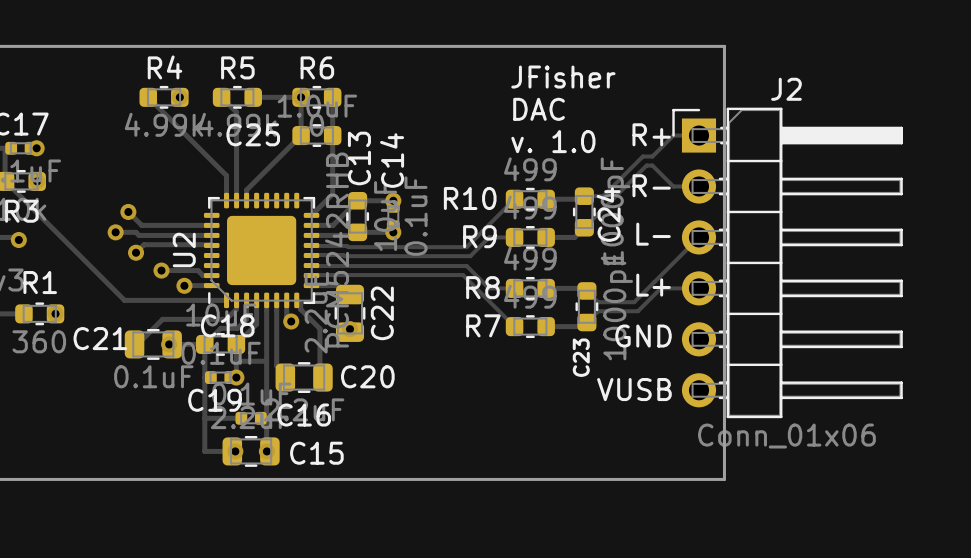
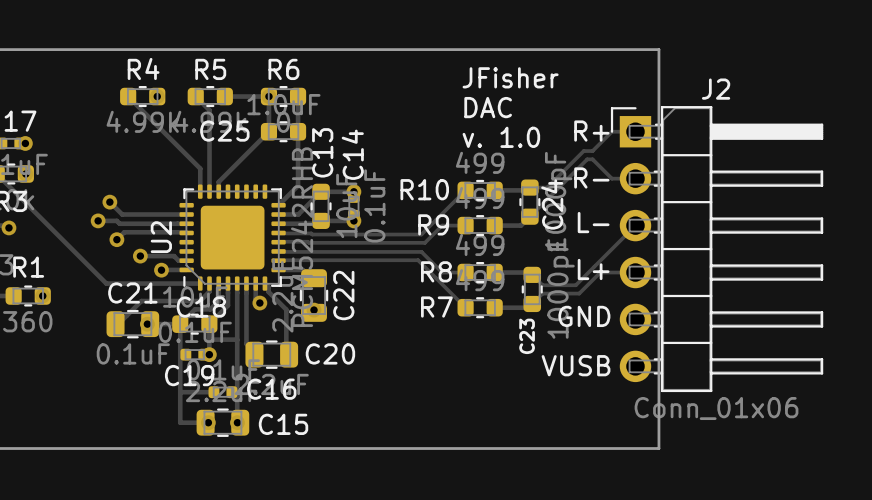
C21 name position: C21 (100, 338) -> C21 (132, 292)

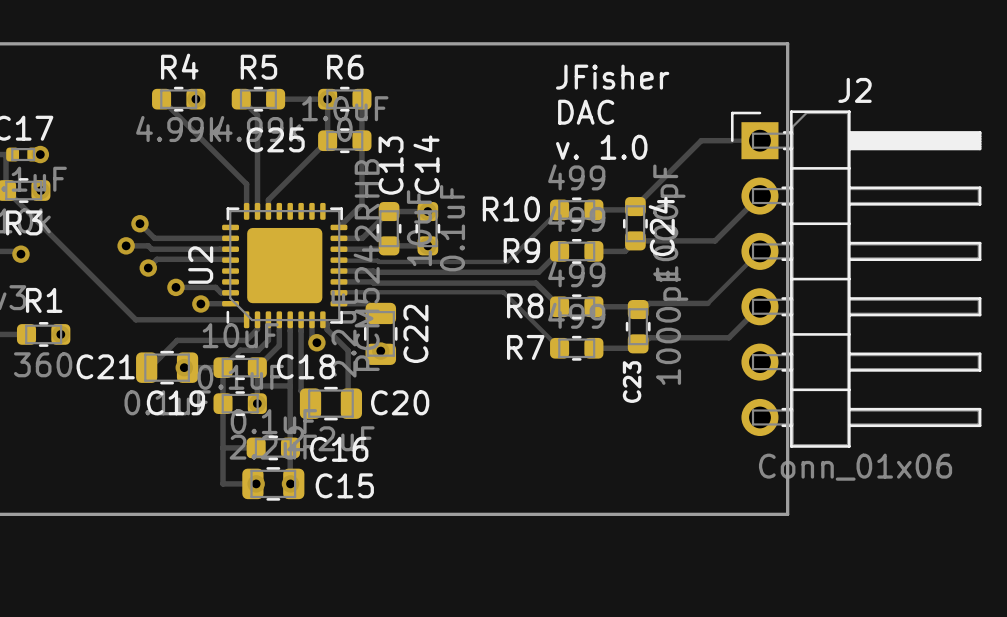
text: R+ (591, 131) -> none
track: (611, 131) (592, 151) (583, 151) (547, 187) (529, 187) -> (732, 140) (701, 140) (635, 206)
text: R- (591, 177) -> none
track: (635, 178) (611, 178) (592, 159) (587, 159) (529, 216) -> (759, 196) (715, 240) (635, 240)
C14 footprint: [347, 191, 360, 221] -> [415, 202, 441, 256]
text: L- (593, 222) -> none
track: (465, 225) (442, 225) (424, 242) (278, 242) -> (559, 251) (538, 272) (338, 271)
track: (278, 251) (421, 251) (442, 272) (465, 272) -> (338, 281) (535, 283) (559, 306)
track: (591, 269) (575, 285) (542, 285) (529, 272) -> (707, 303) (649, 303) (645, 306) (635, 306)
text: L+ (593, 269) -> none
track: (635, 272) (600, 272) (579, 293) (542, 293) (528, 307) -> (759, 306) (728, 337) (649, 337) (638, 348) (633, 348)
C21 name position: C21 (132, 292) -> C21 (105, 366)
C18 name position: C18 (201, 307) -> C18 (306, 366)
text: GND (584, 316) -> none
C19 footprint: [180, 348, 210, 361] -> [213, 391, 267, 417]
text: VUSB (576, 365) -> none
C19 name position: C19 (189, 375) -> C19 (175, 402)
C16 footprint: [208, 386, 238, 399] -> [246, 435, 301, 461]

